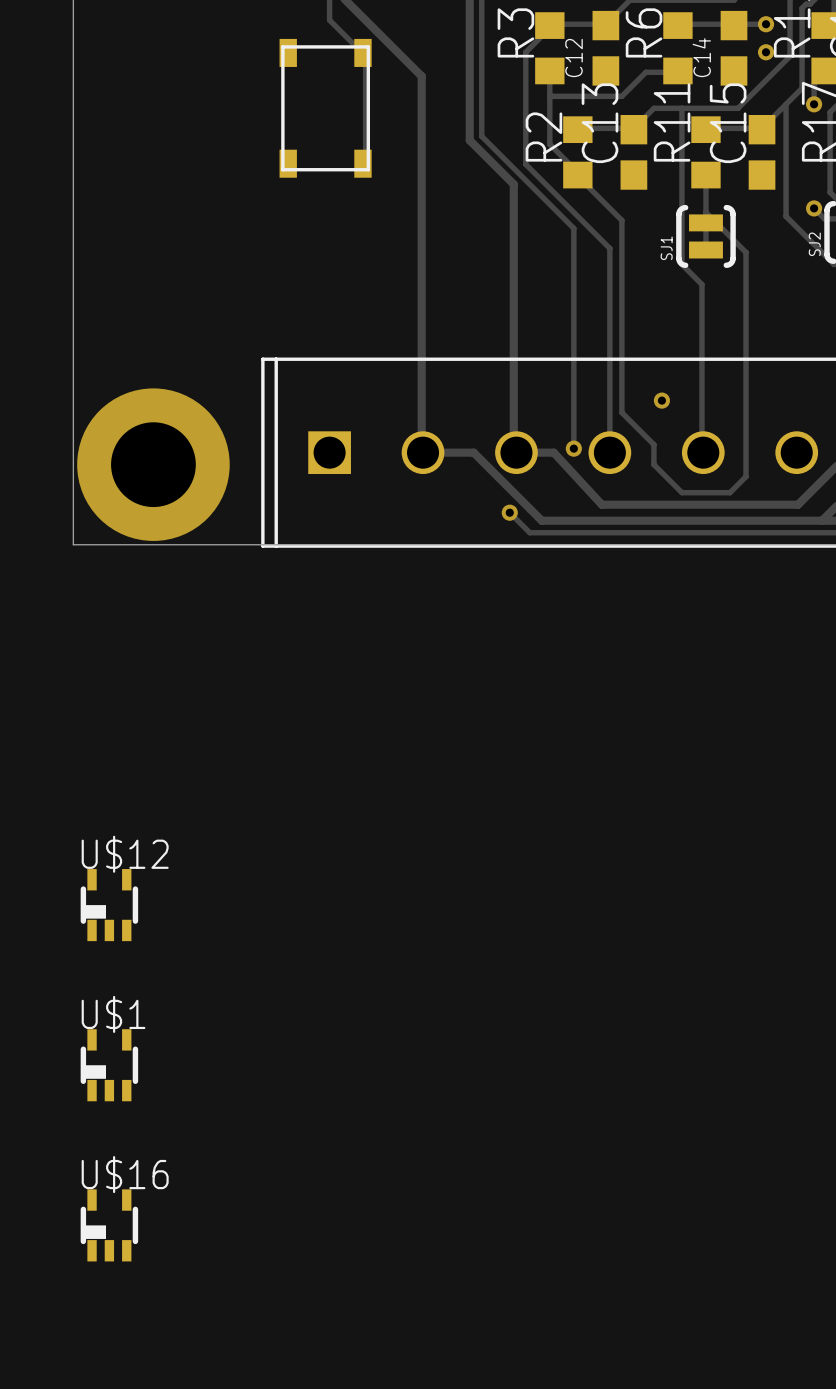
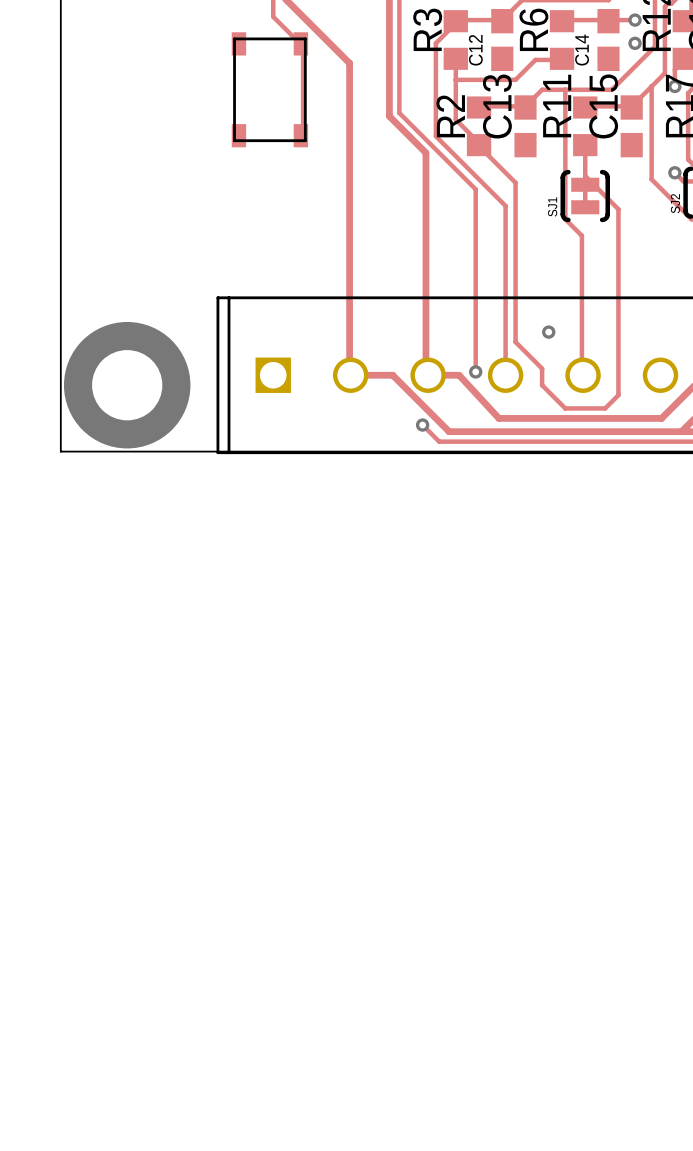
U$12: (109, 905) -> none
U$1: (109, 1065) -> none
U$16: (109, 1225) -> none

